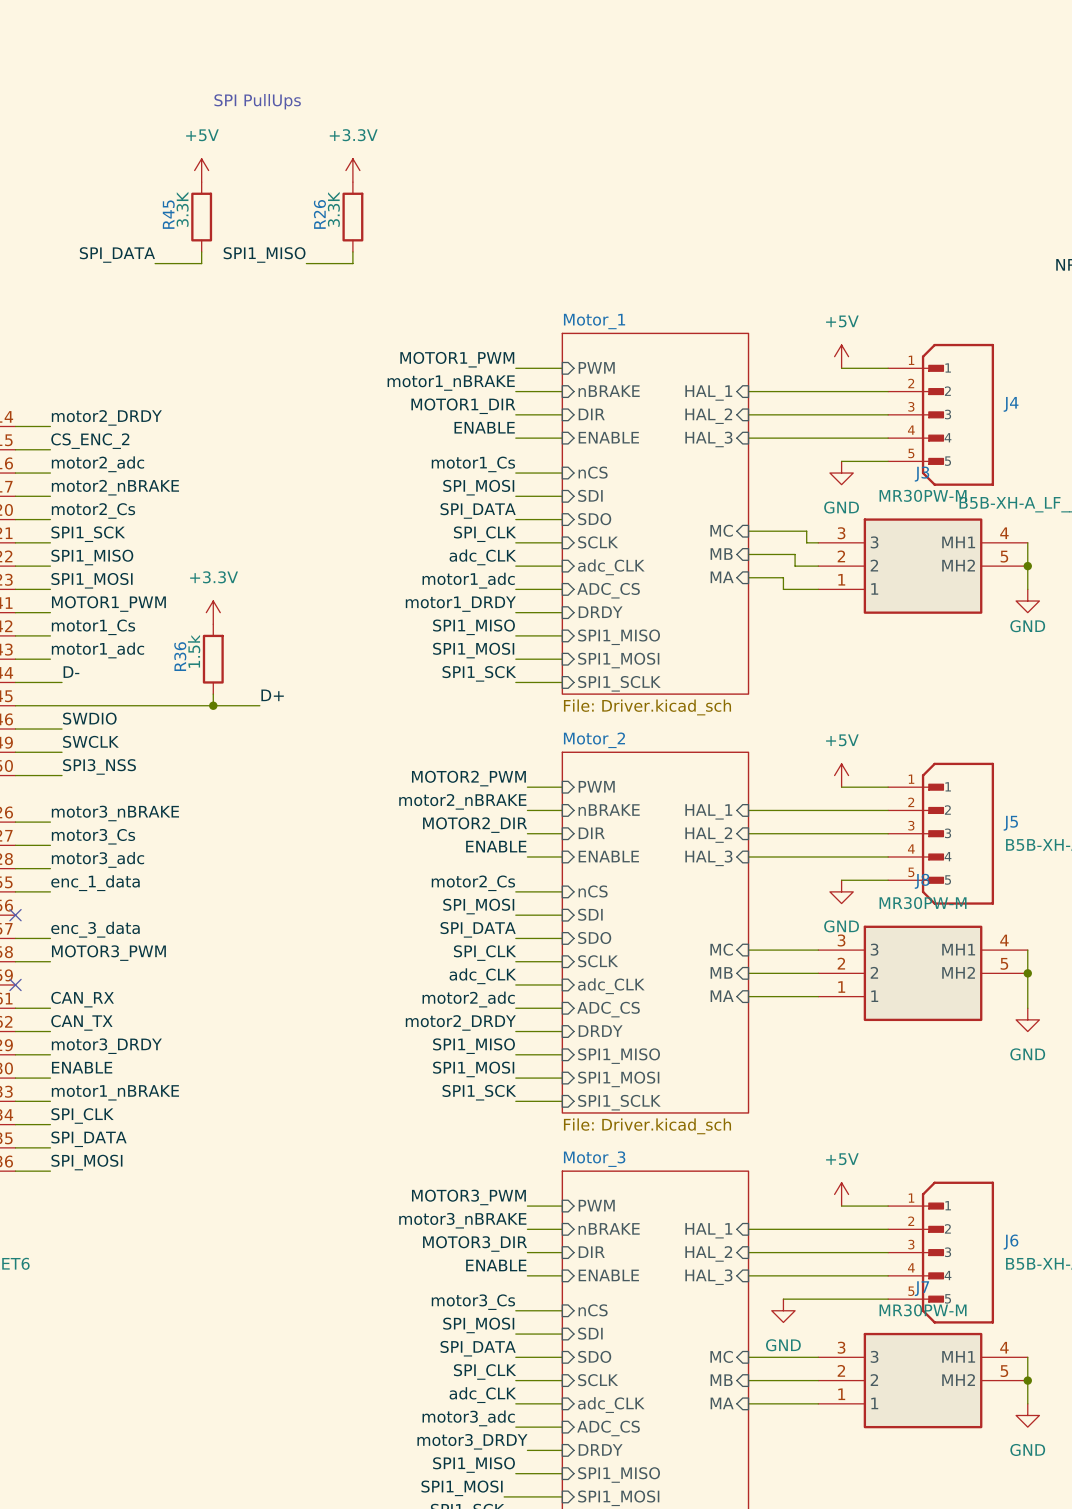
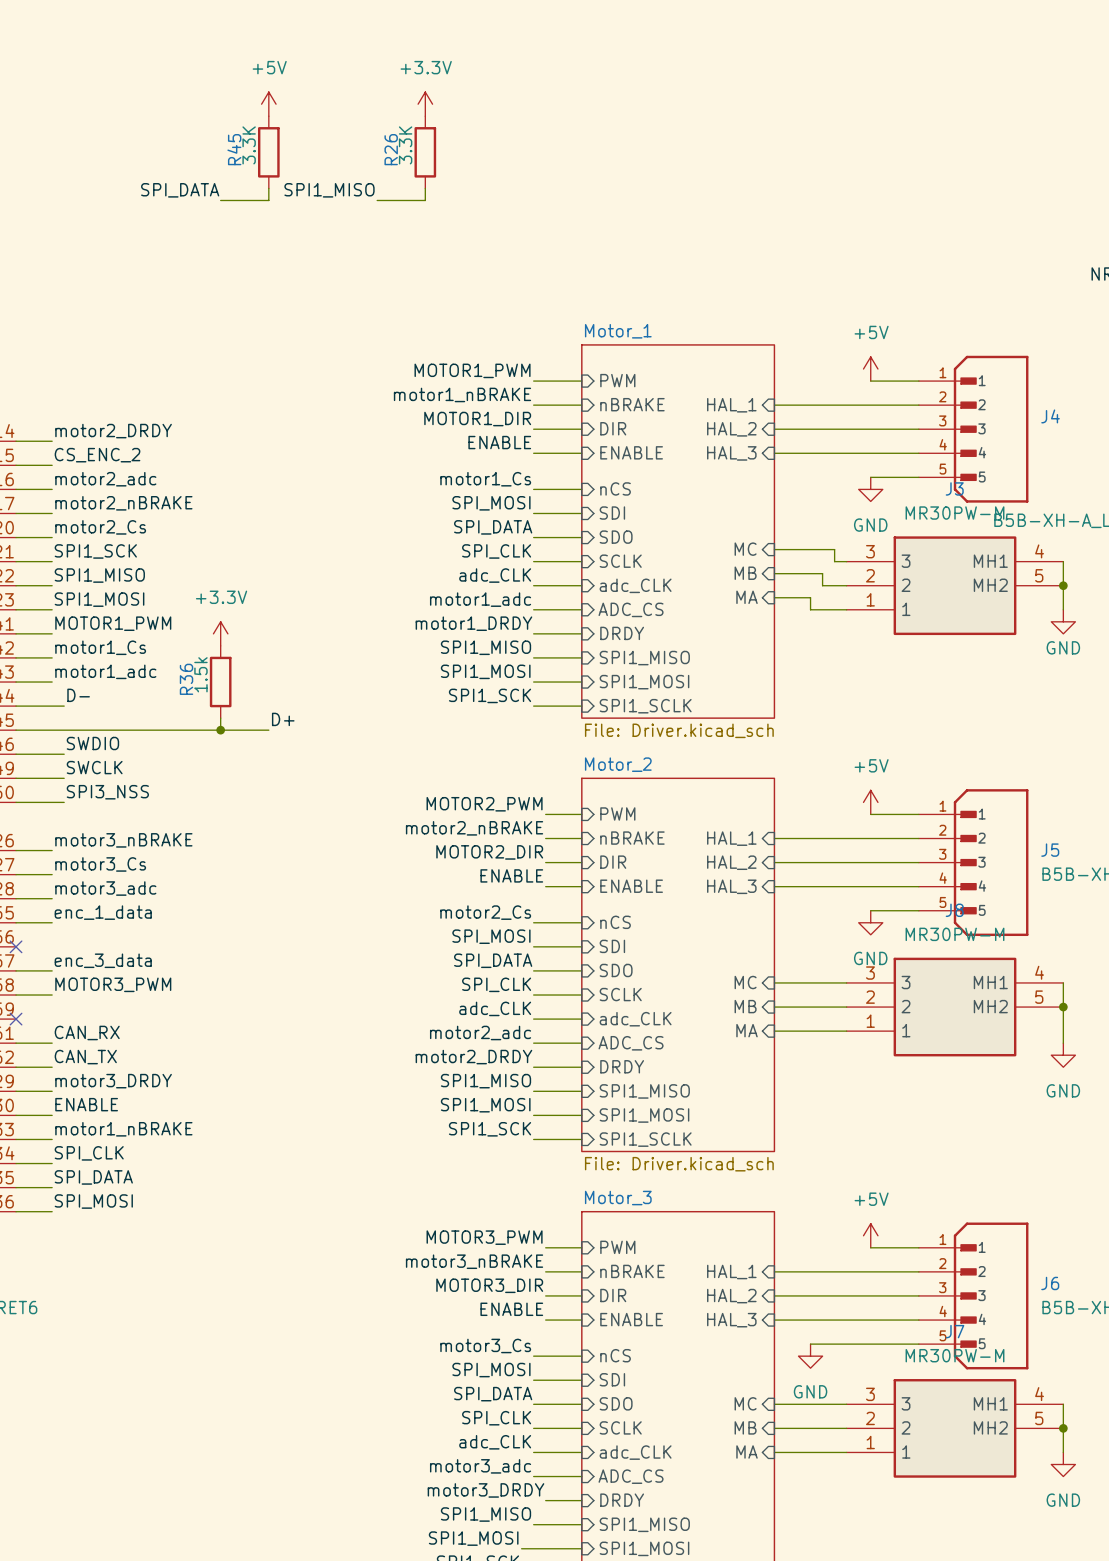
text: SPI PullUps (257, 101) -> none
power symbol position: +5V (201, 170) -> +5V (268, 104)
power symbol position: +3.3V (352, 170) -> +3.3V (425, 104)
R45 position: (201, 217) -> (268, 152)
R26 position: (352, 217) -> (425, 152)
wire: (201, 251) (201, 263) (155, 263) -> (268, 188) (268, 200) (220, 200)
wire: (352, 251) (352, 263) (306, 263) -> (425, 188) (425, 200) (377, 200)
label position: SPI_DATA (117, 254) -> SPI_DATA (180, 190)
label position: SPI1_MISO (264, 254) -> SPI1_MISO (329, 190)

